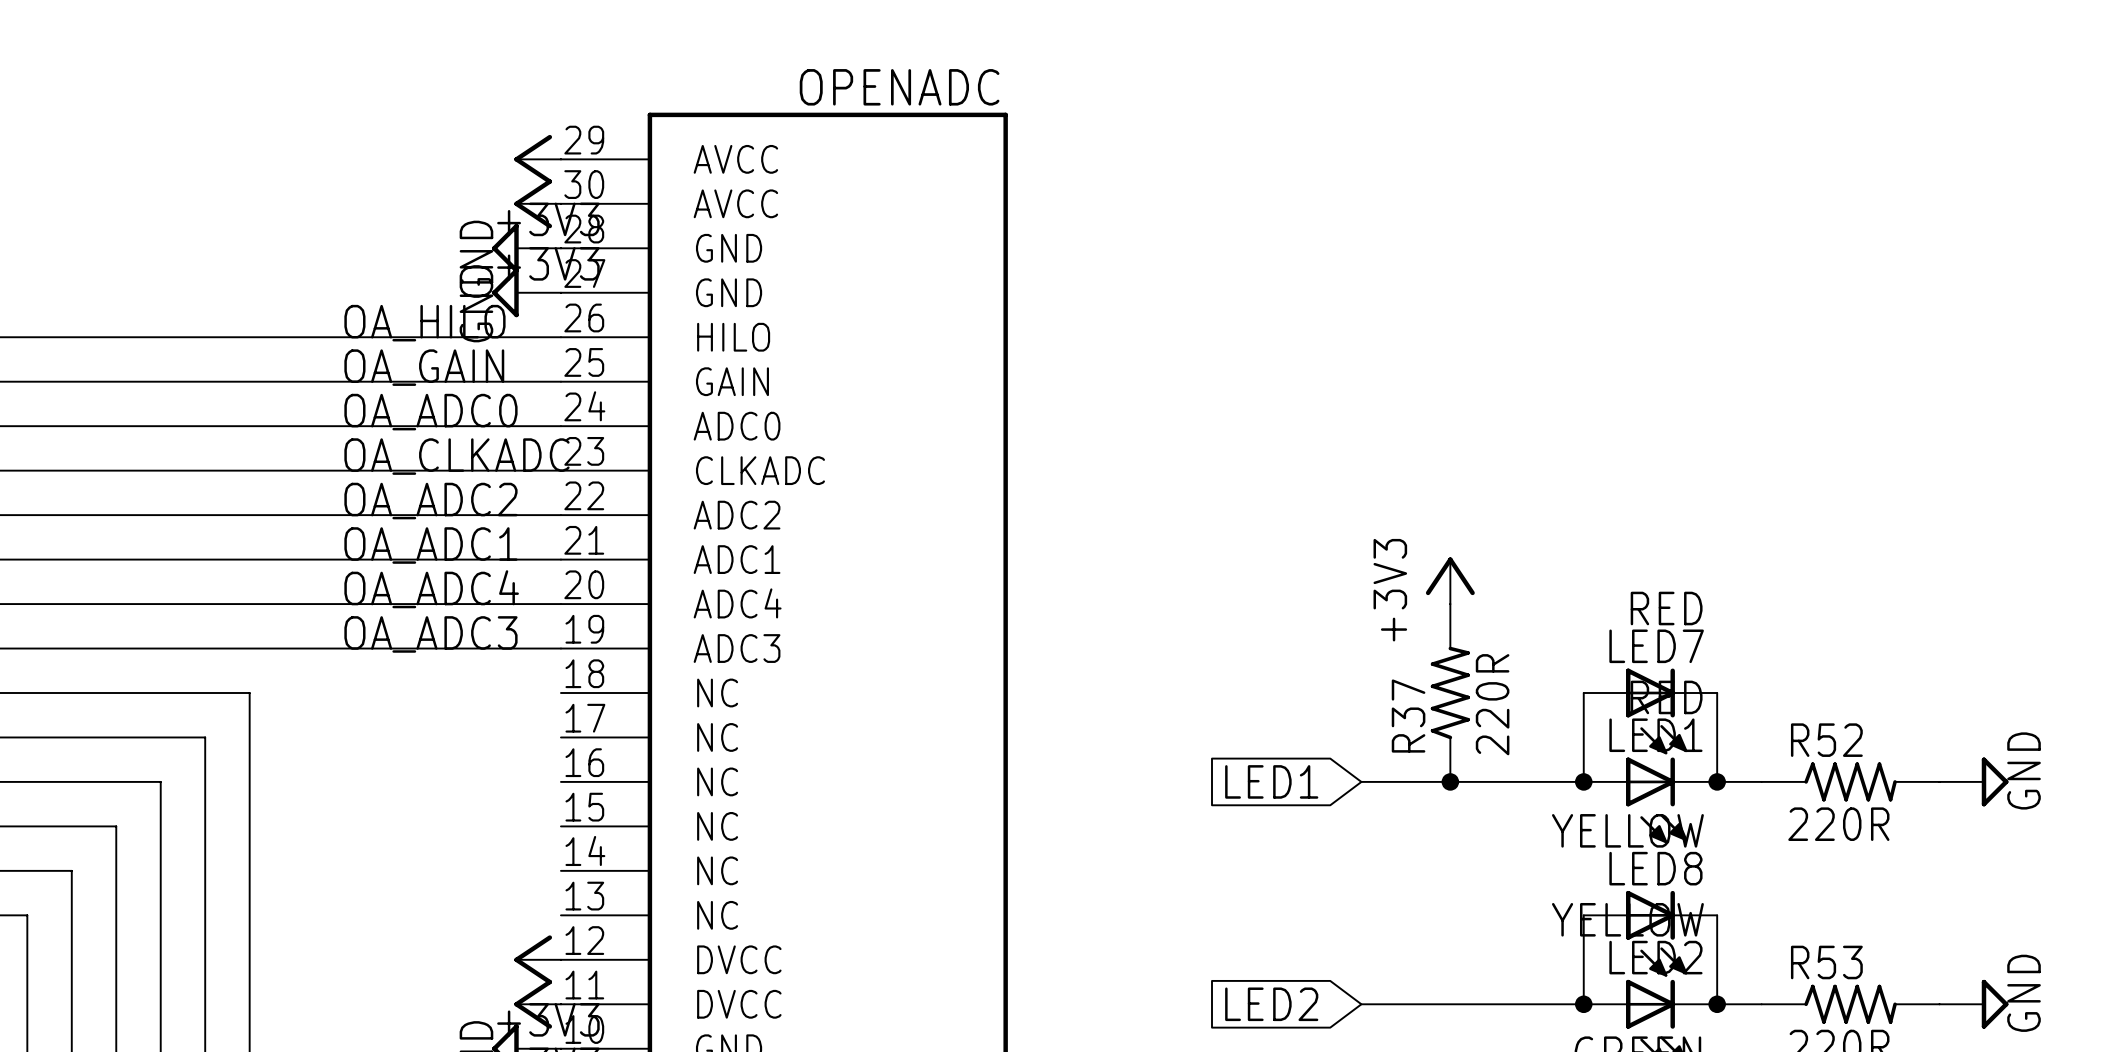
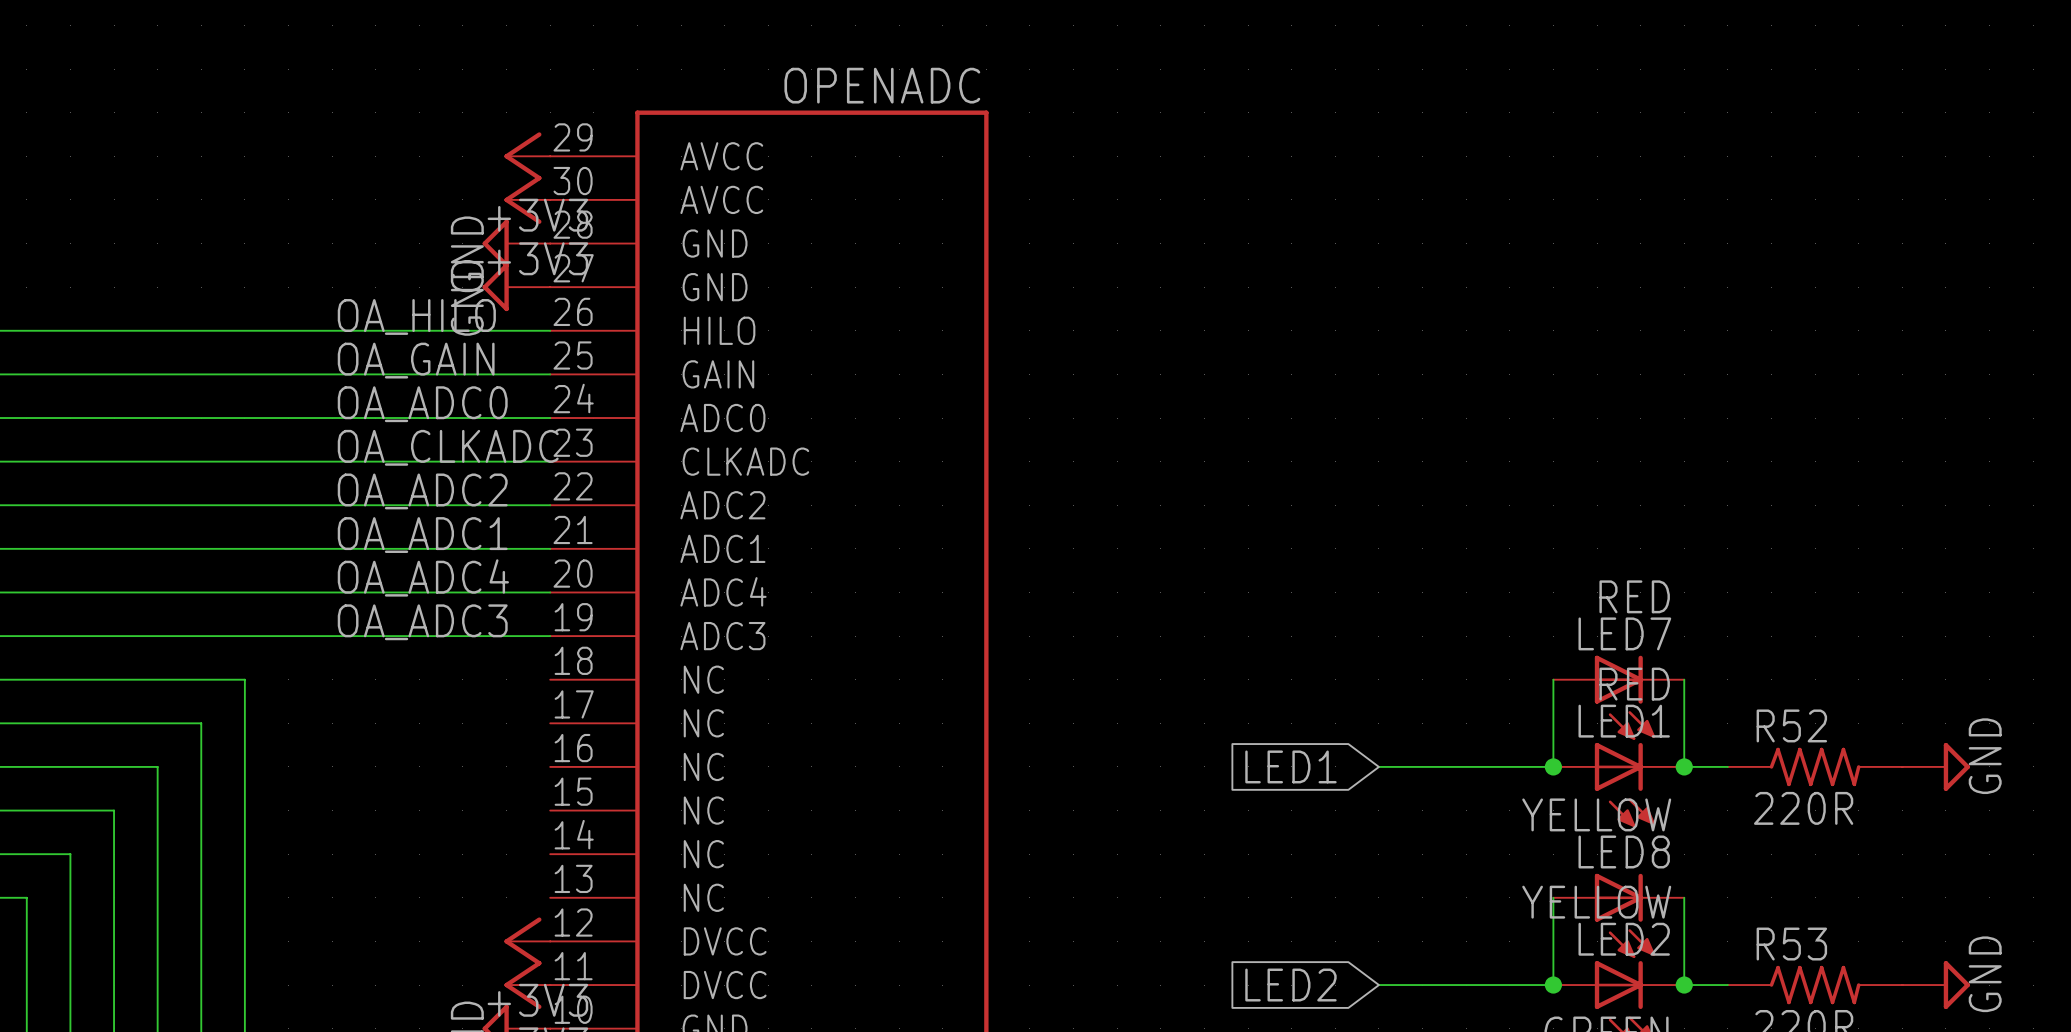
power symbol: +3V3 (1450, 580) -> none
R37: 220R (1450, 692) -> none
global label position: LED1 (1271, 781) -> LED1 (1290, 766)
wire: (1361, 781) (1405, 781) -> none
junction: (1450, 781) -> none
global label position: LED2 (1271, 1004) -> LED2 (1290, 985)
wire: (1361, 1004) (1405, 1004) -> none

